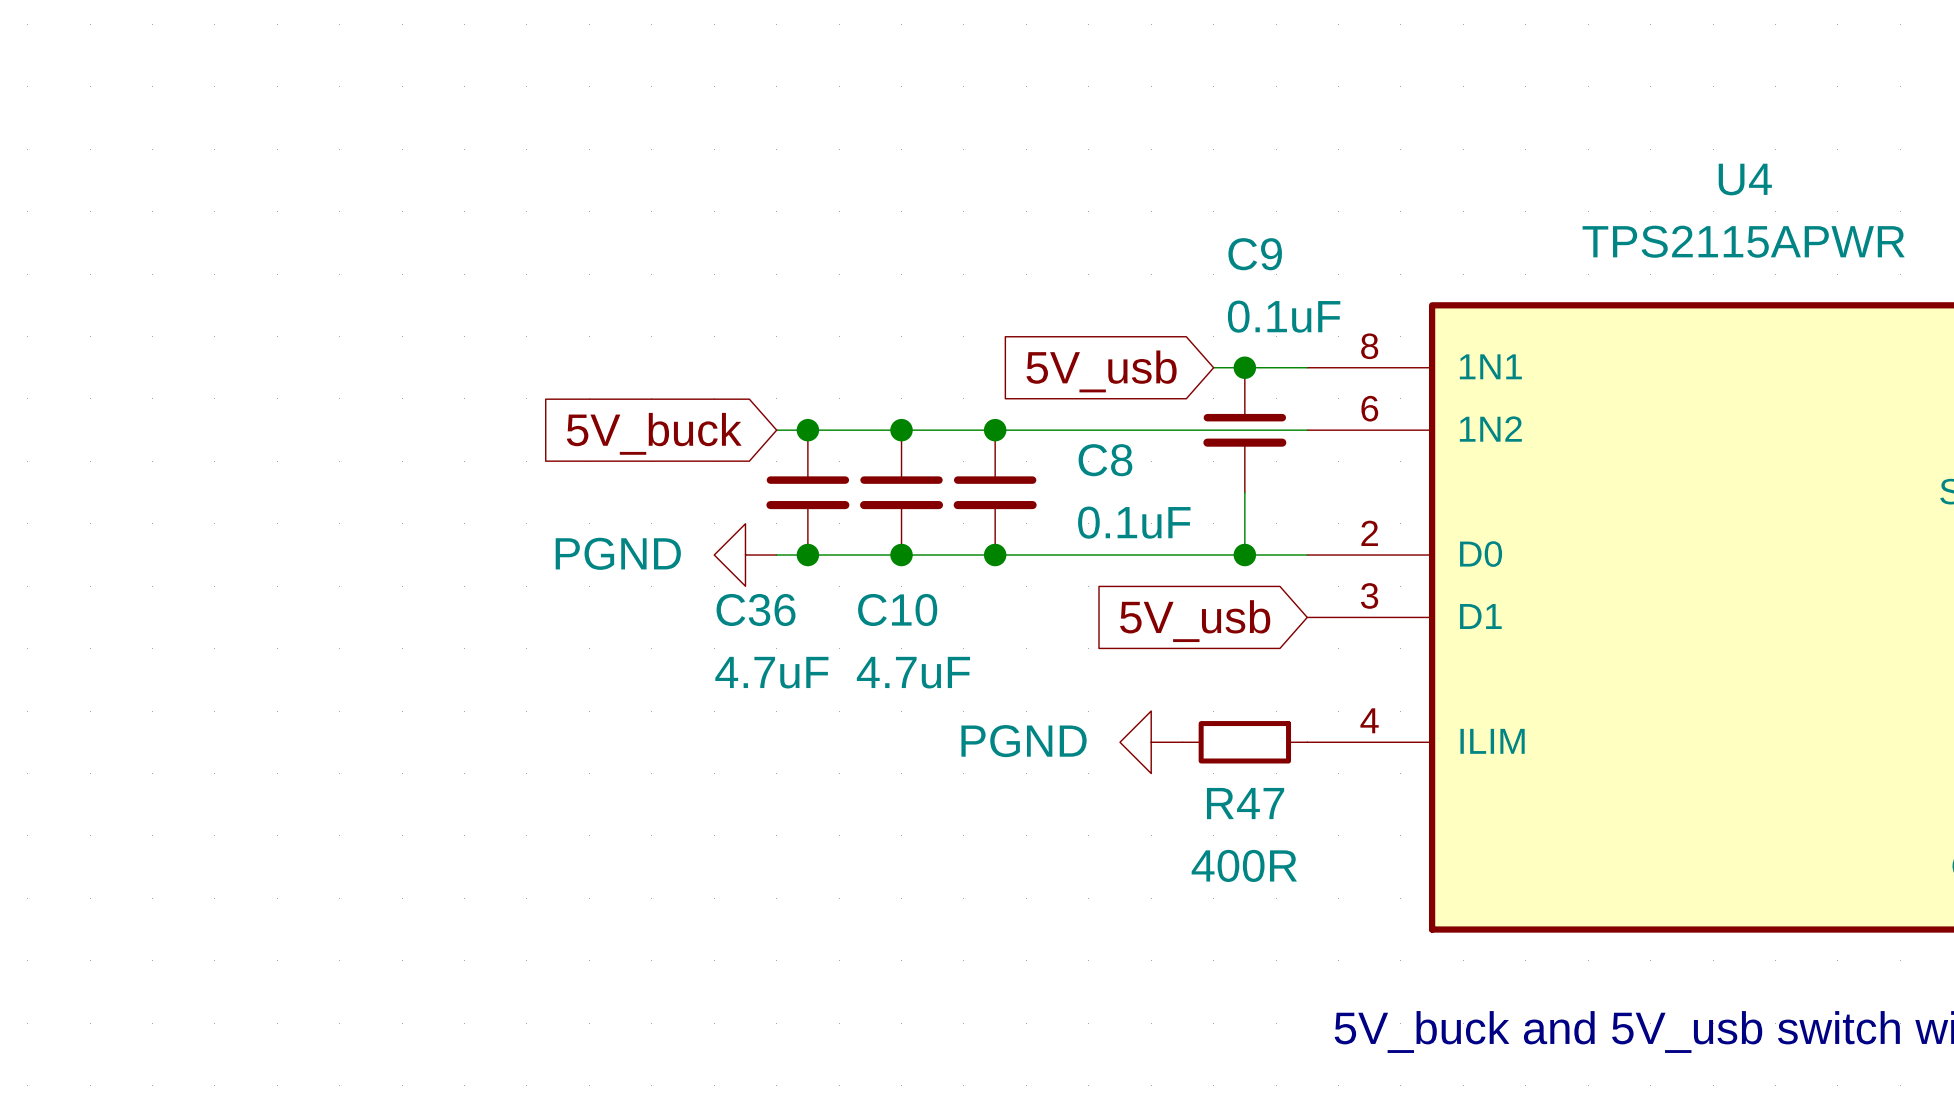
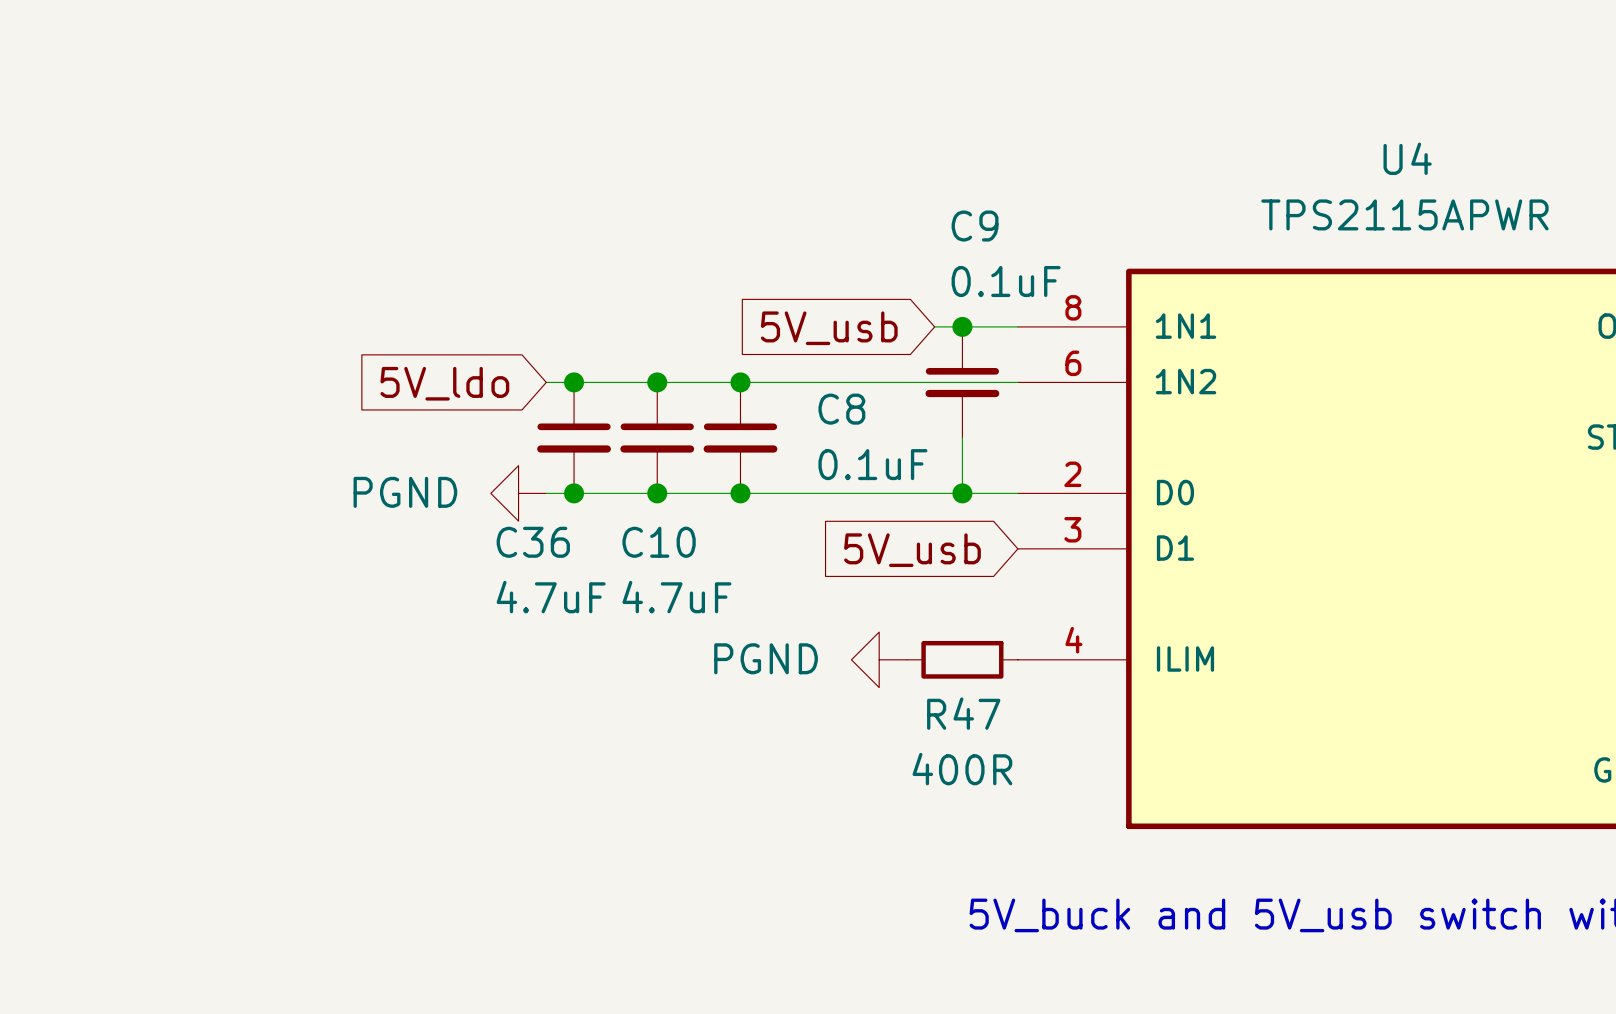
global label: 5V_buck (654, 433) -> 5V_ldo (444, 383)

